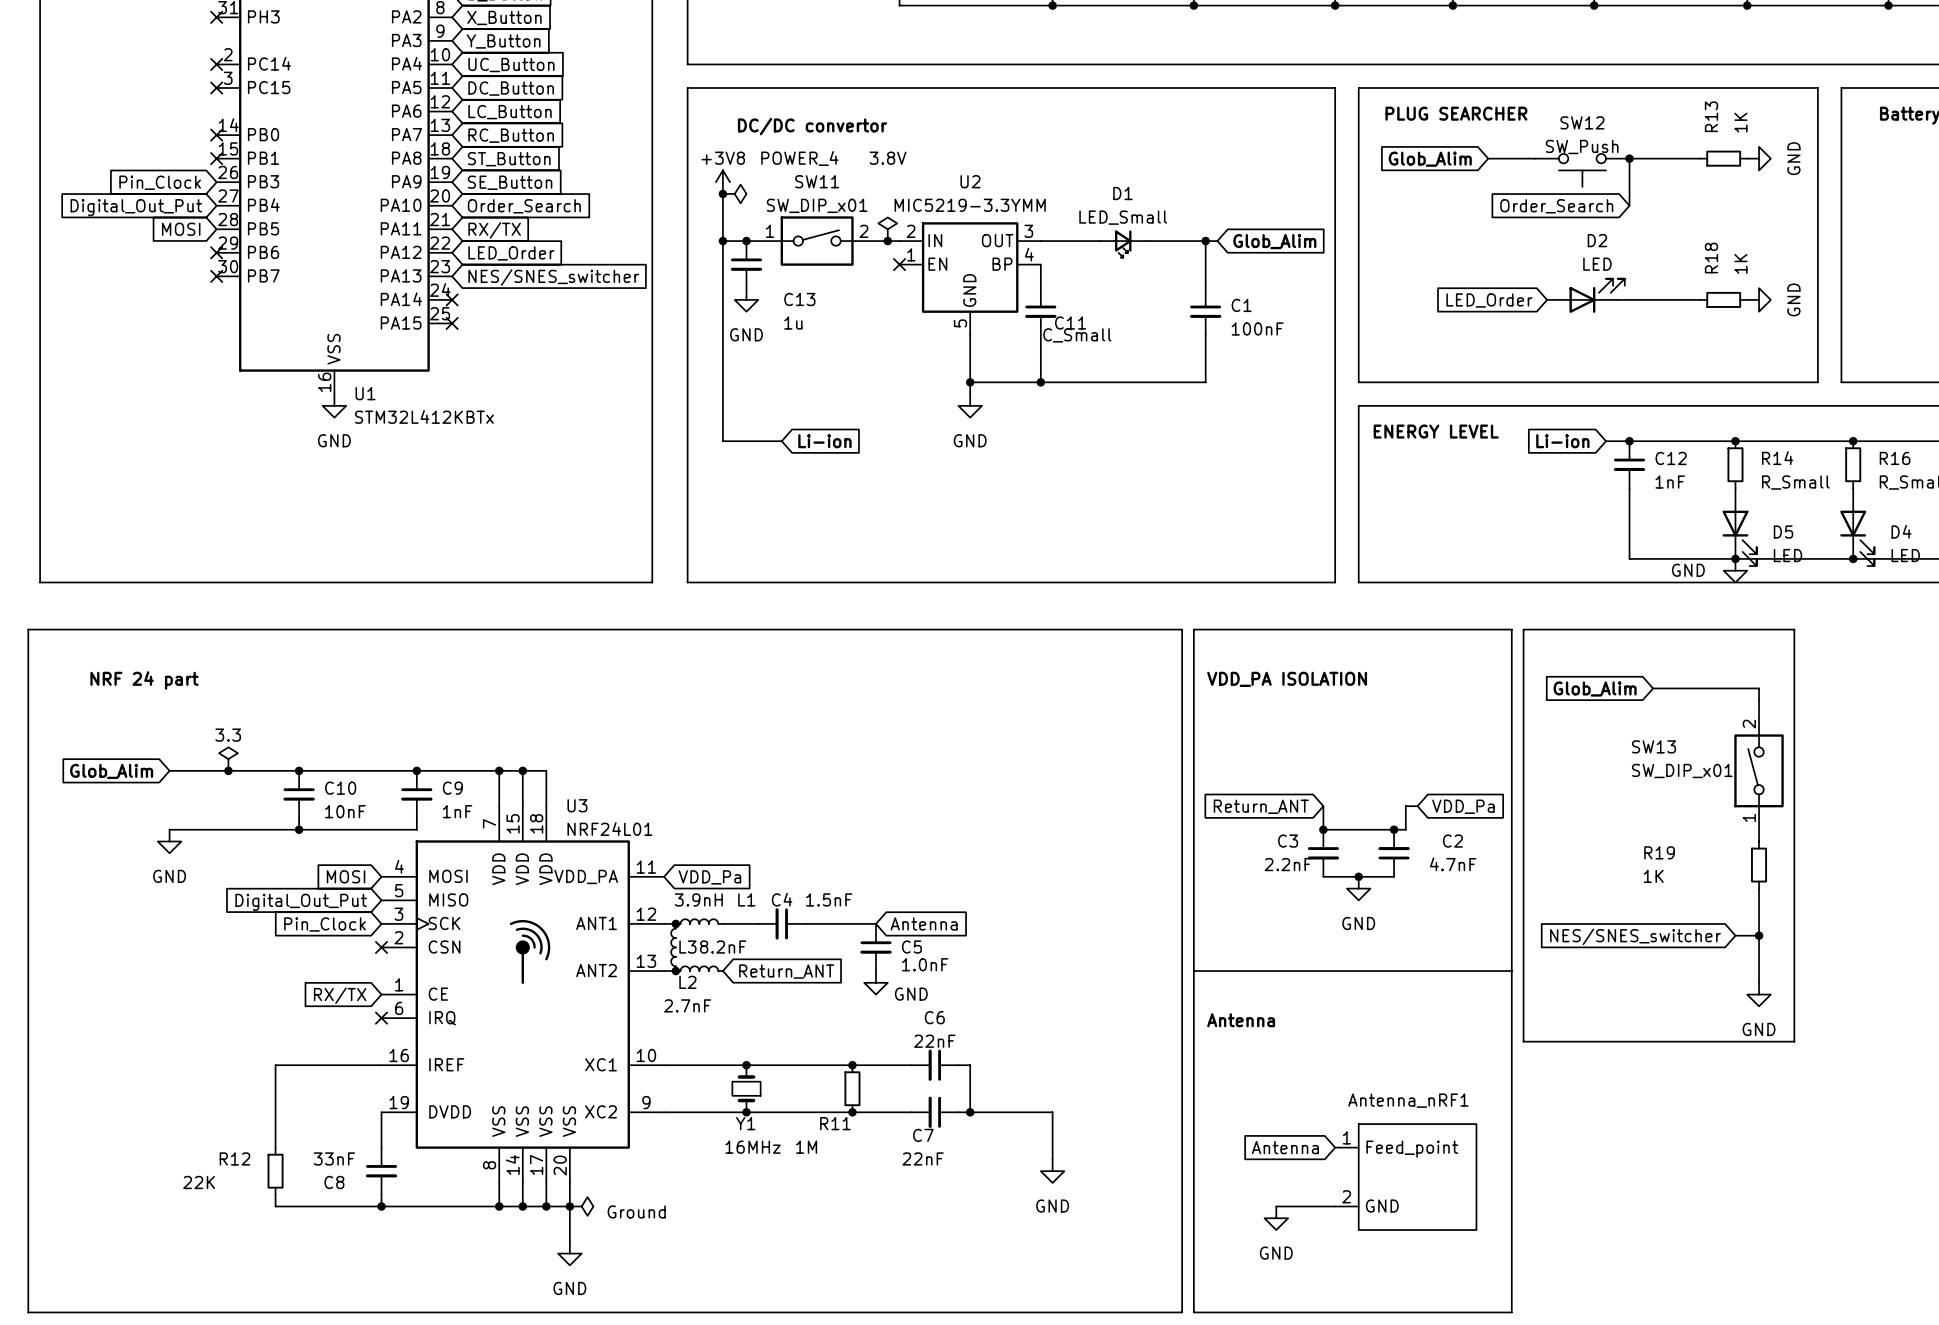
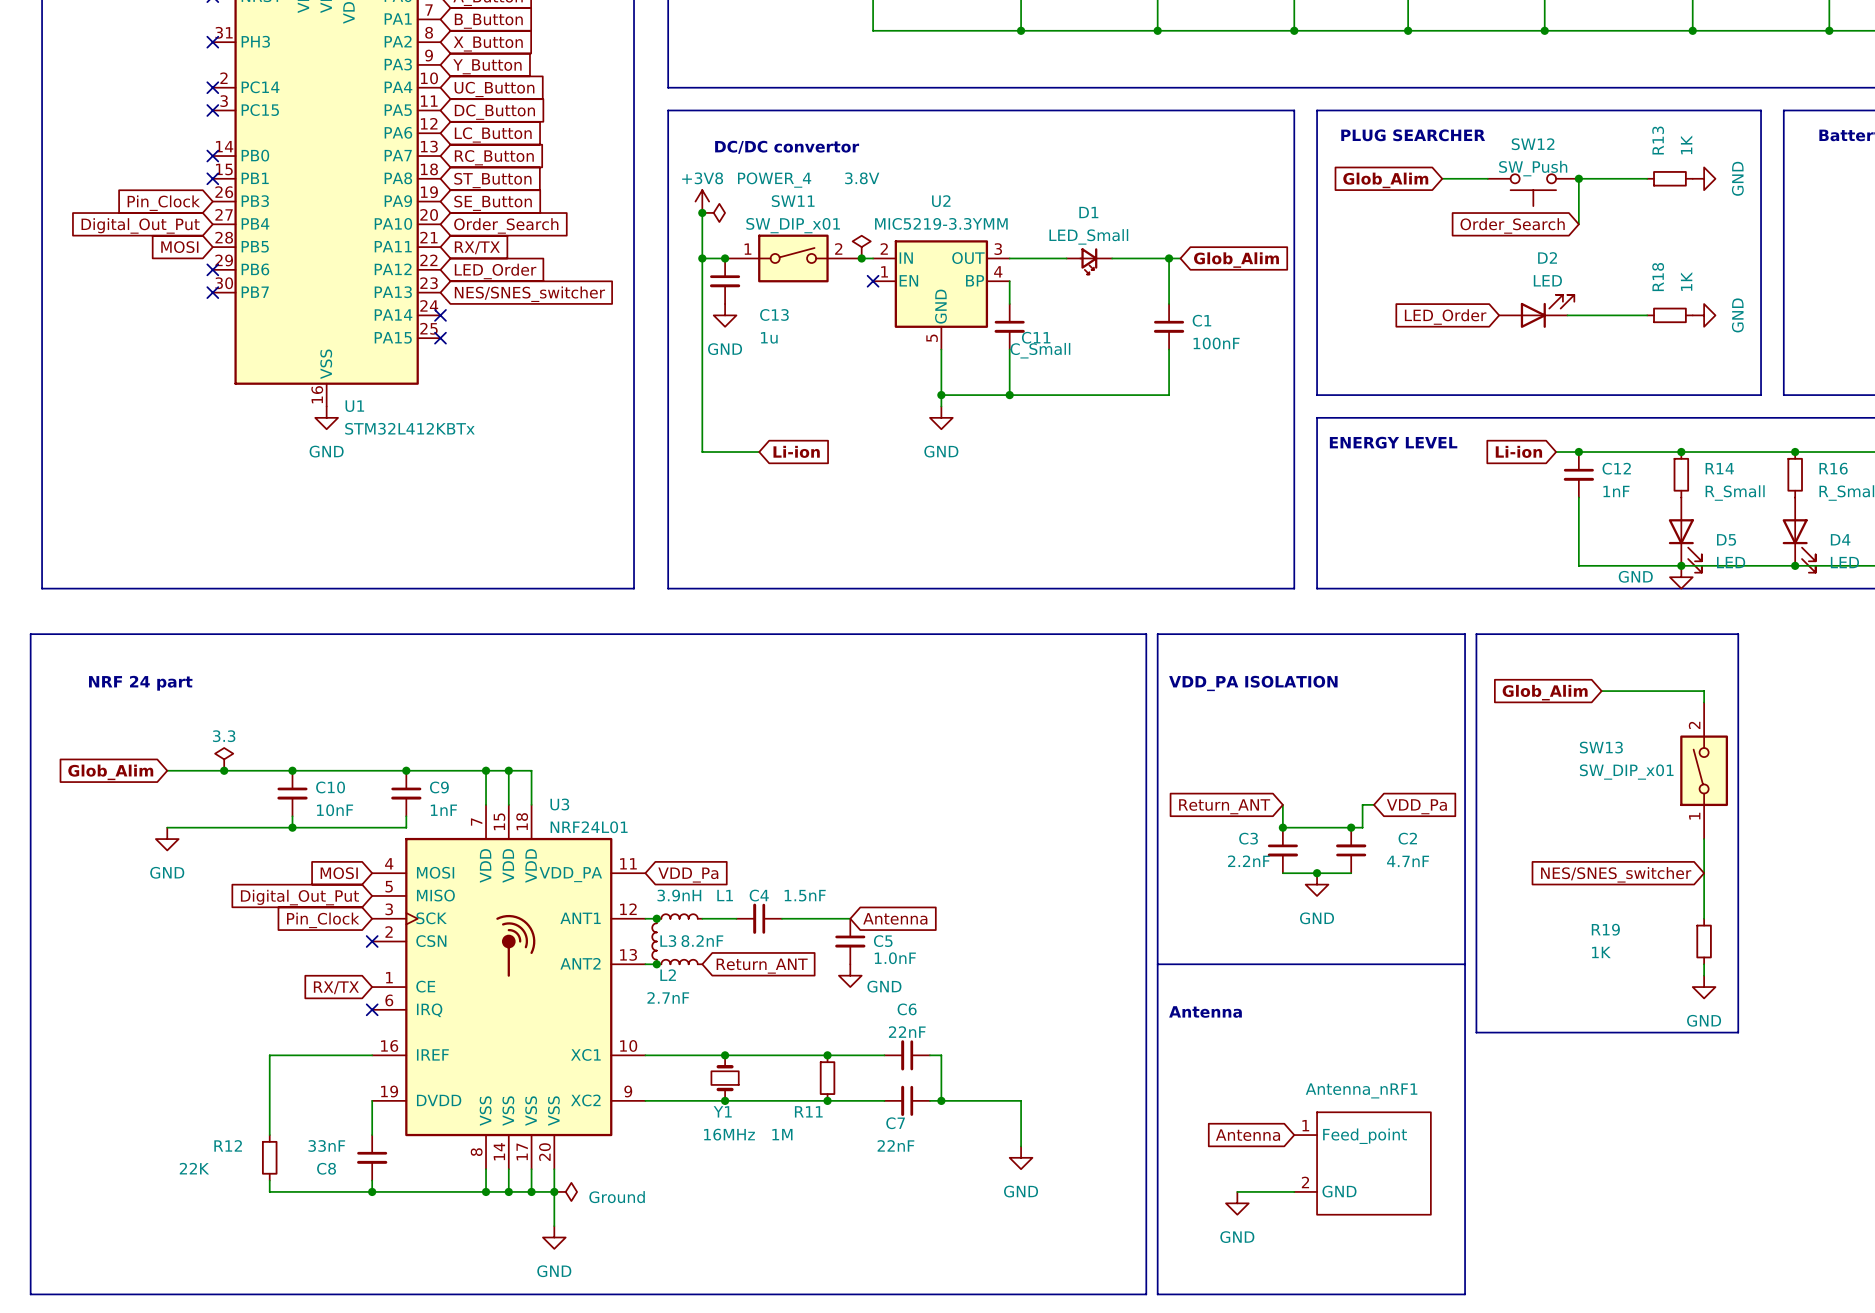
R19 position: (1759, 865) -> (1704, 941)
wire: (1759, 923) (1759, 971) -> (1704, 839) (1704, 884)
wire: (1735, 935) (1759, 935) -> none
junction: (1759, 935) -> none
global label position: NES/SNES_switcher (1635, 936) -> NES/SNES_switcher (1616, 874)

